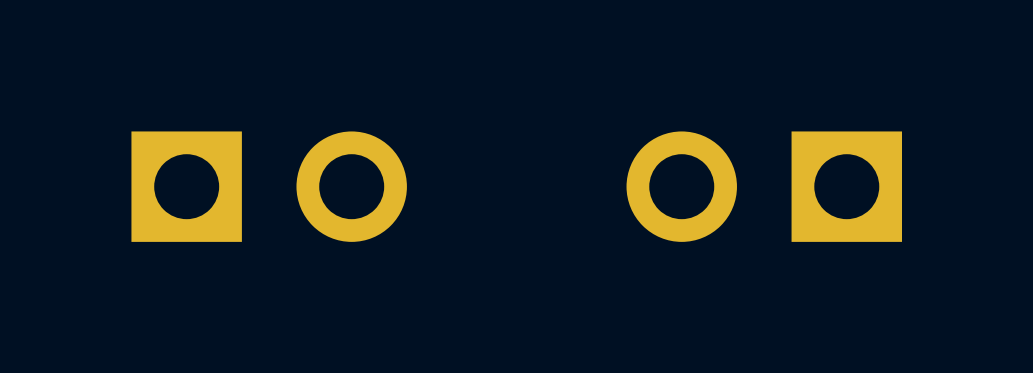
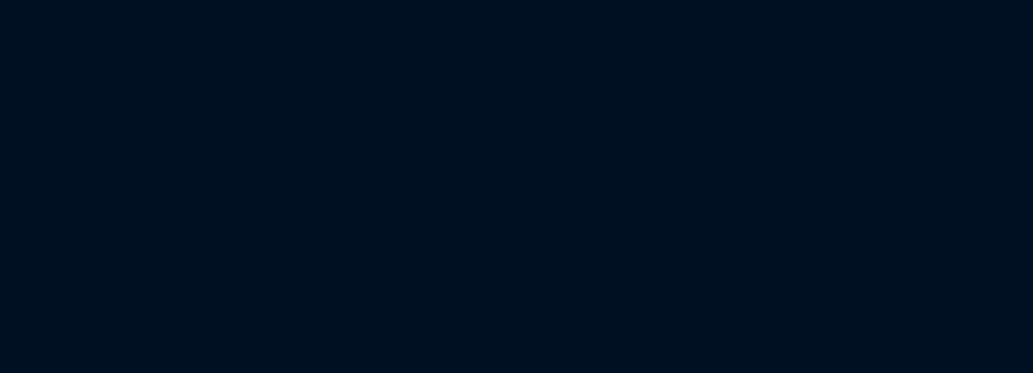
part: (269, 186) -> none
part: (764, 186) -> none

